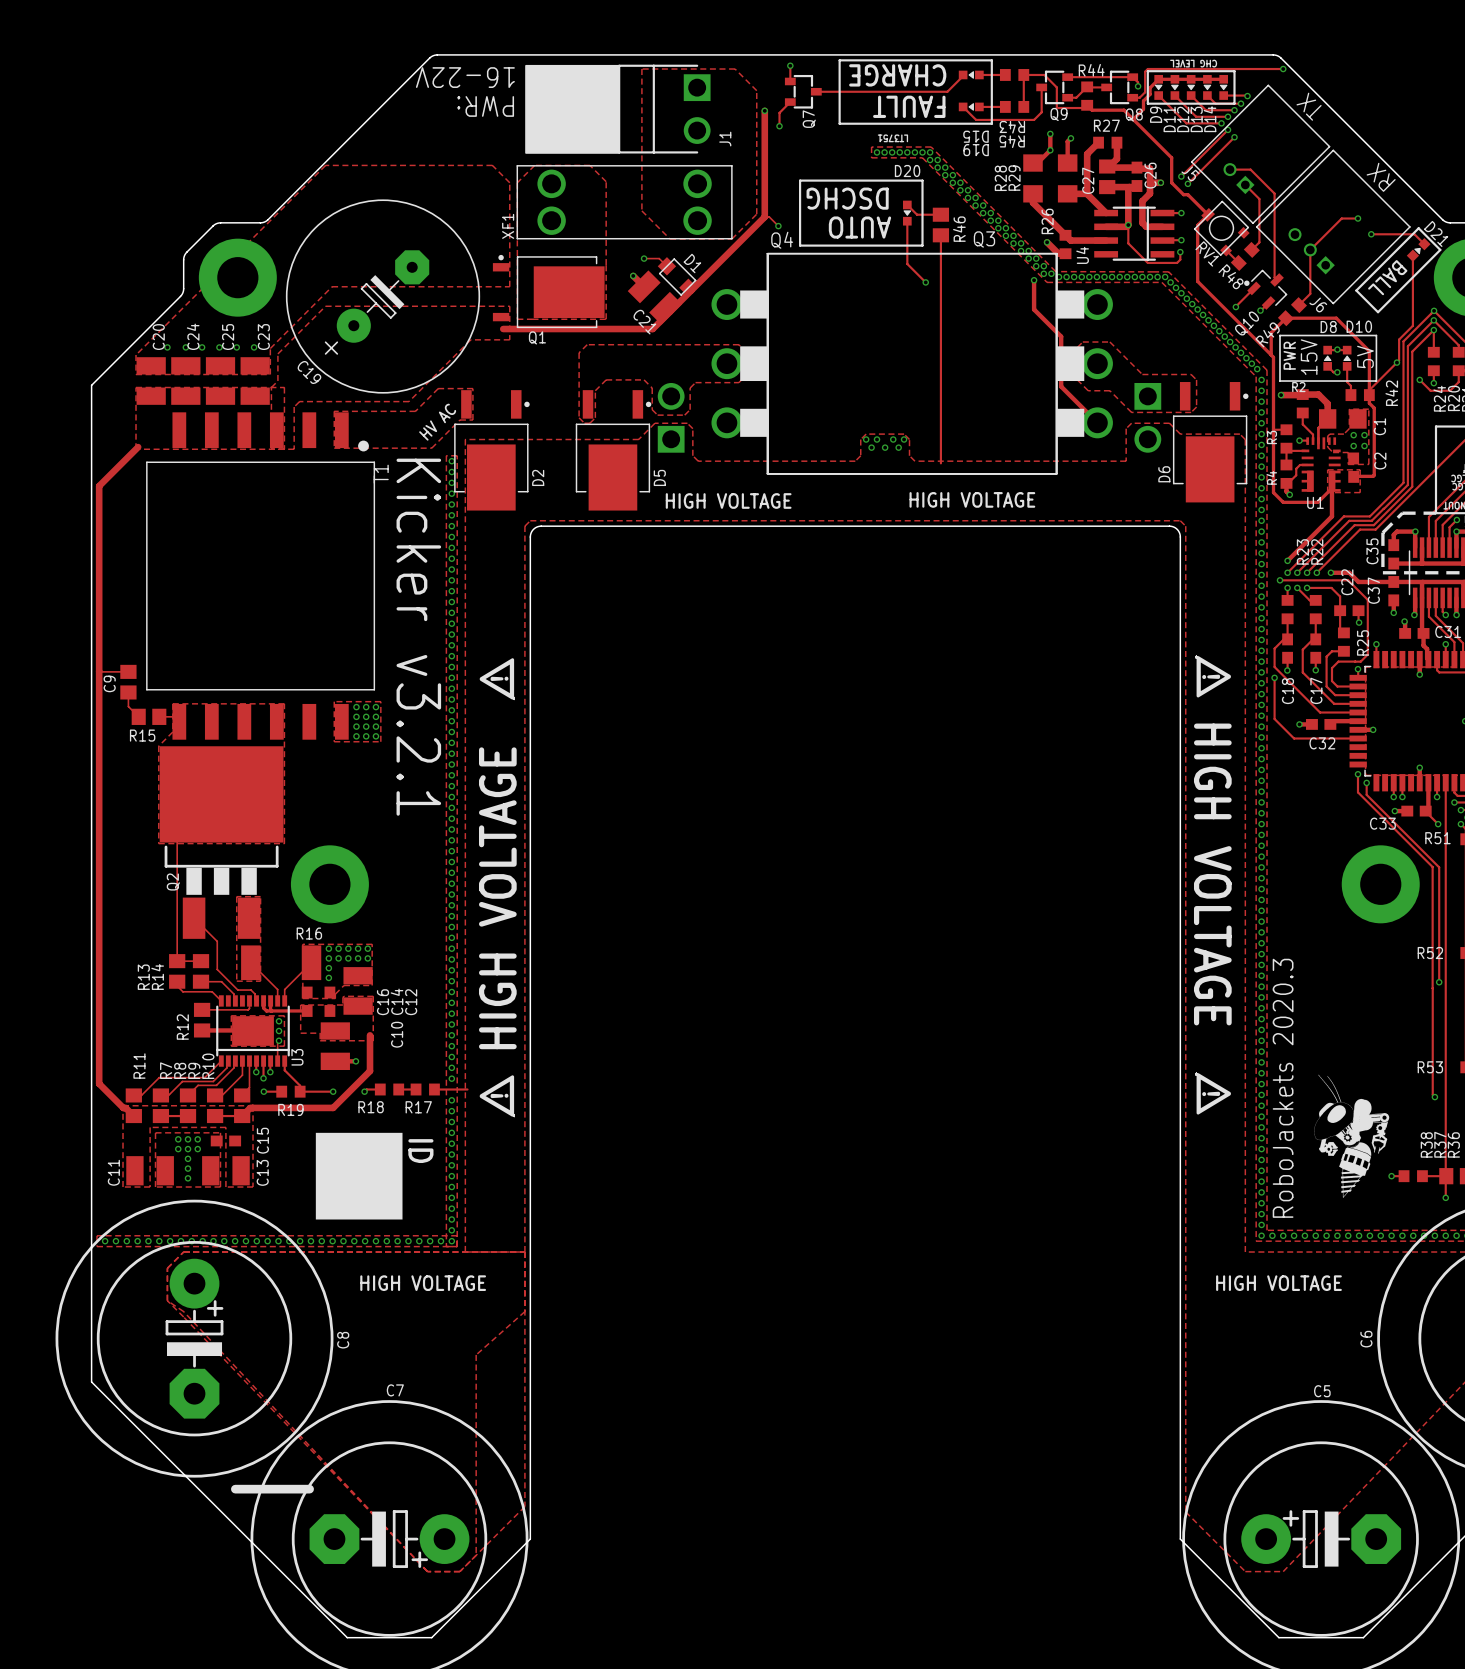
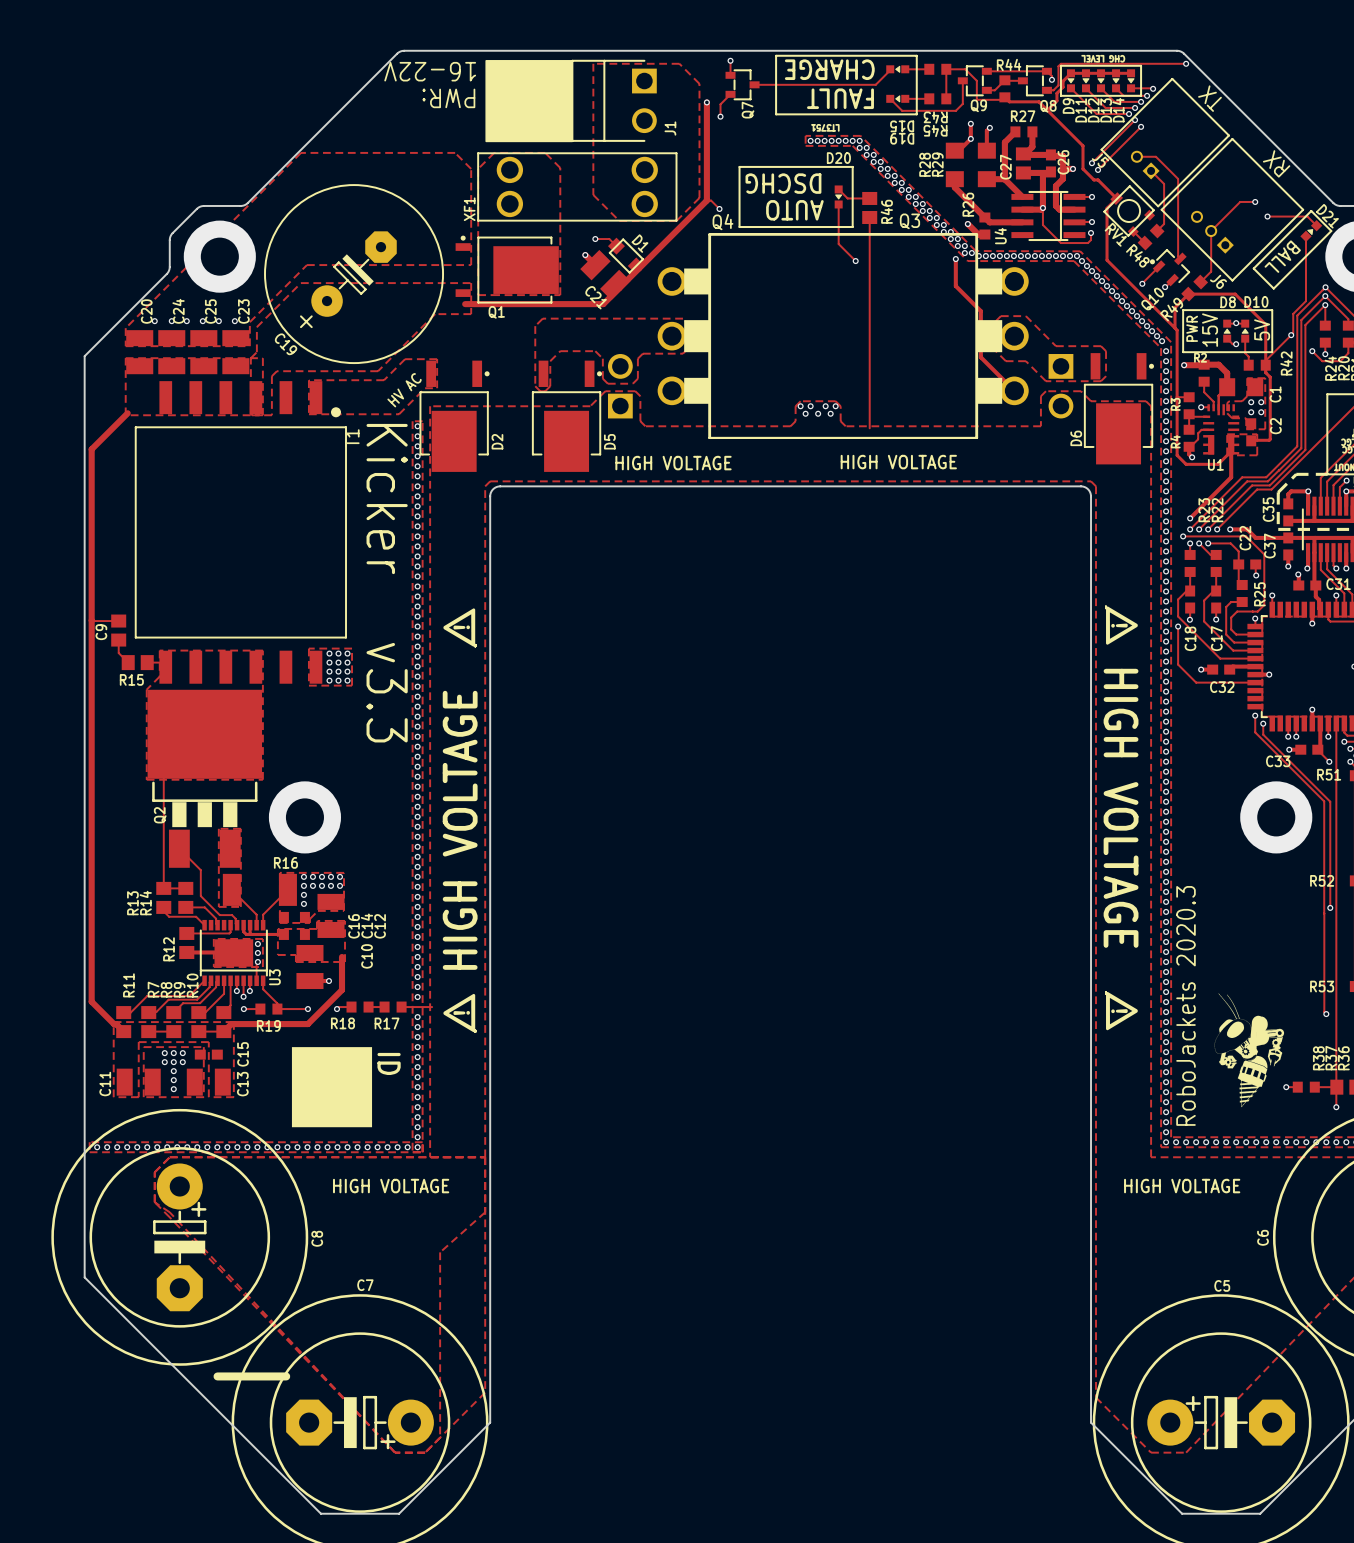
text: Kicker v3.2.1 (418, 637) -> Kicker (387, 499)
text: none -> v3.3 (387, 692)

